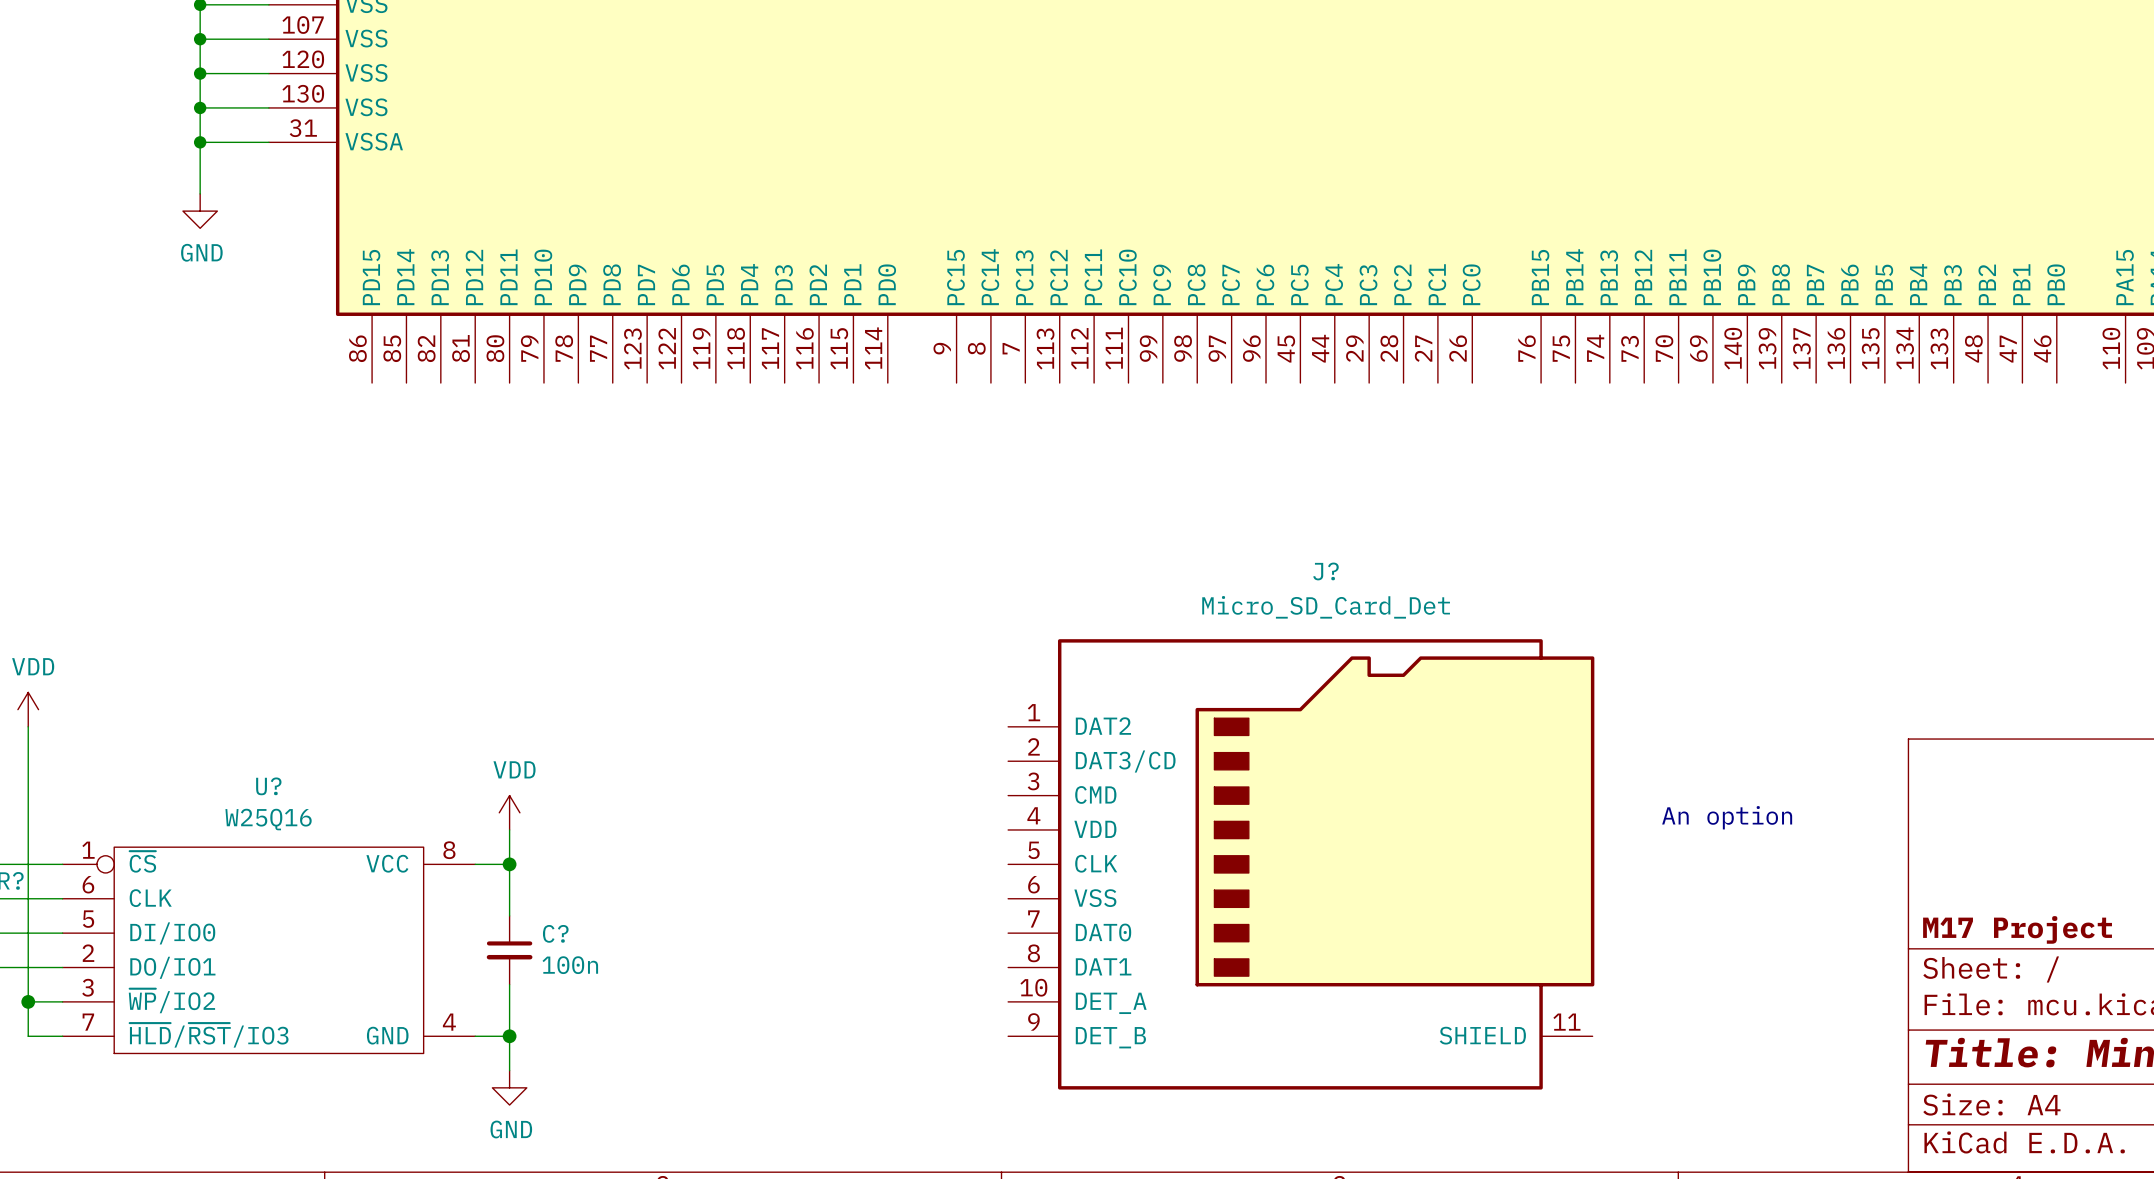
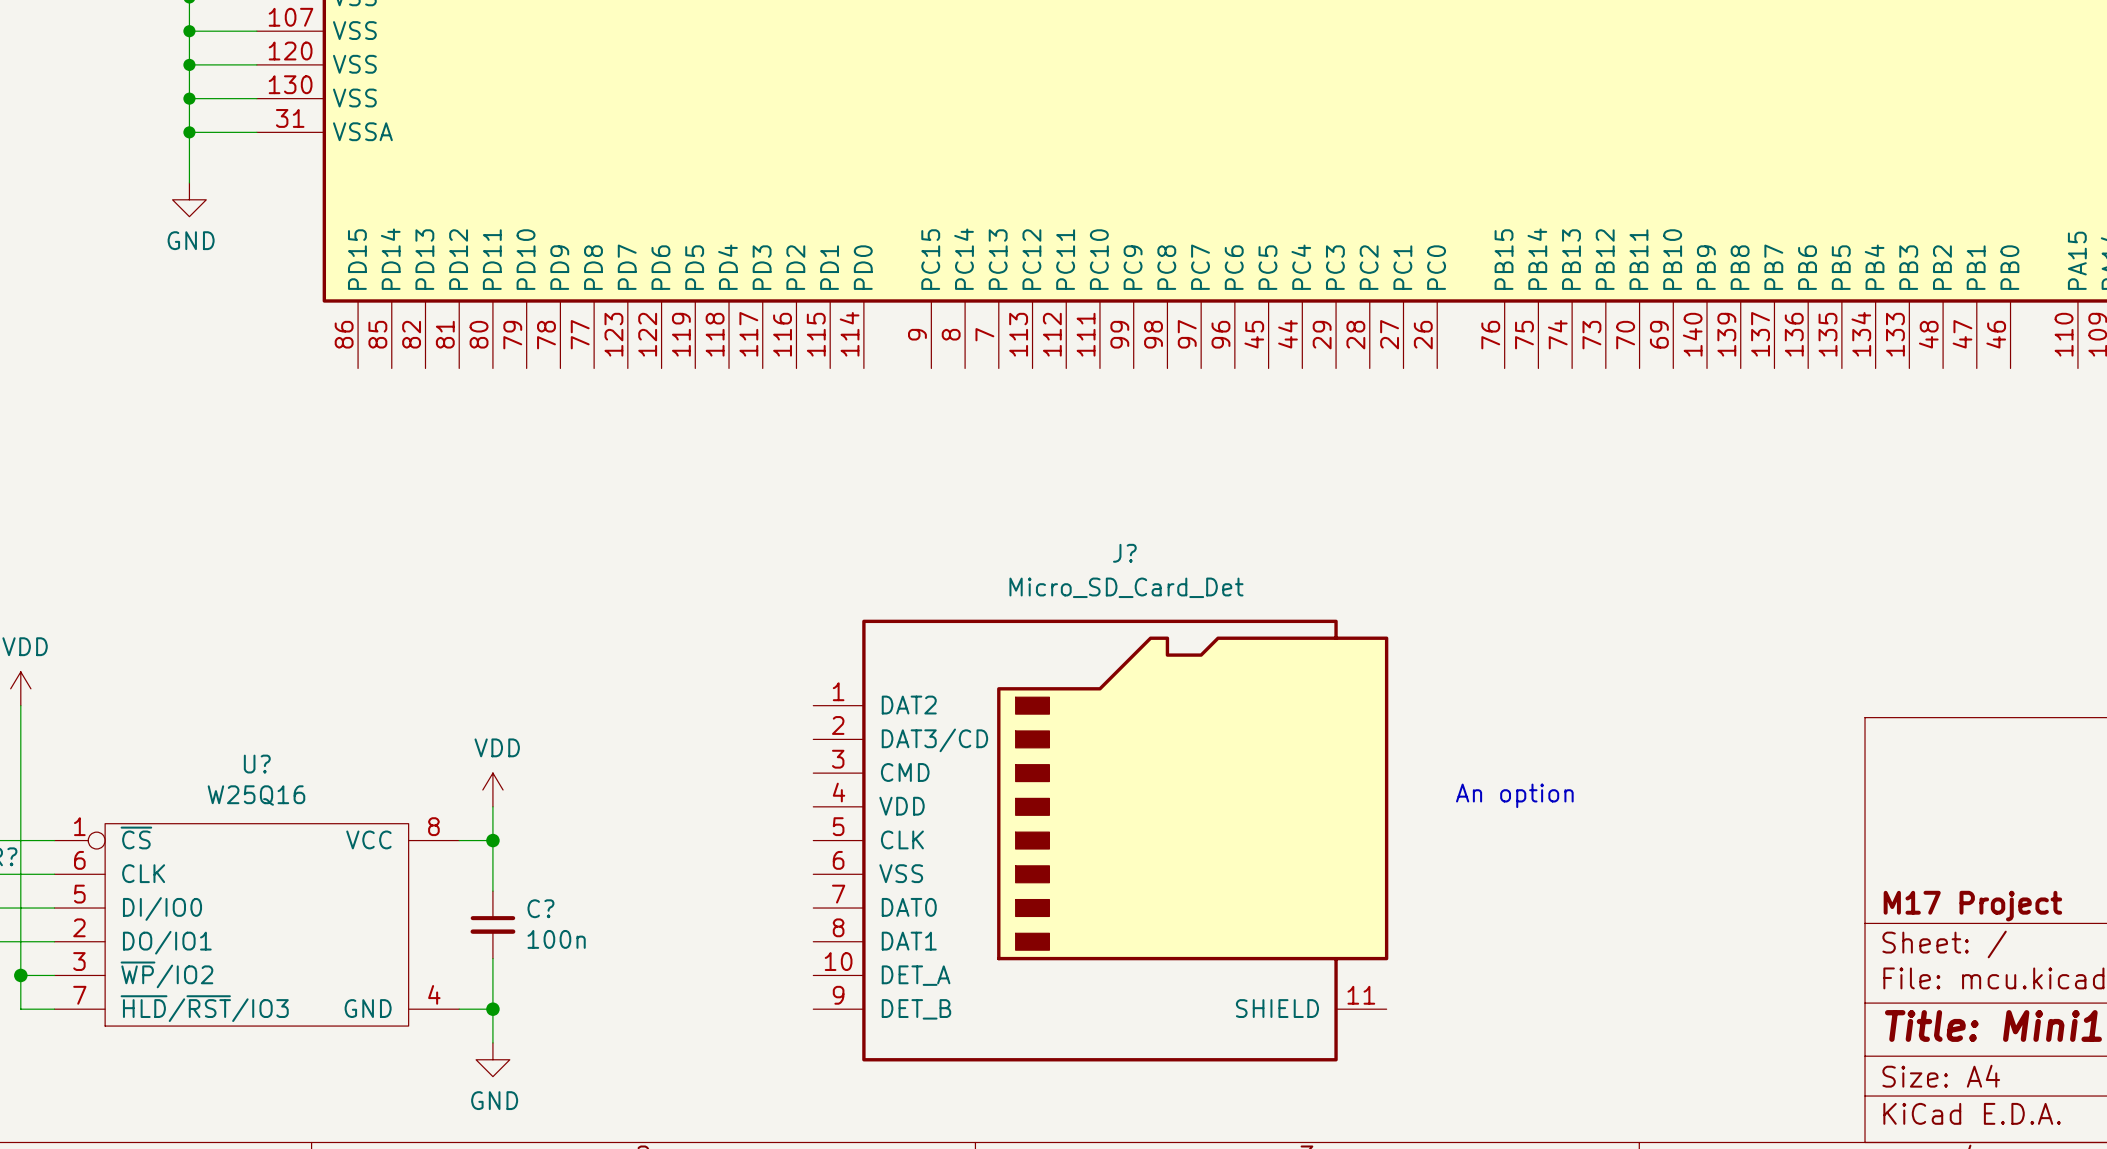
text position: An option (1727, 817) -> An option (1514, 795)
J? position: (1301, 864) -> (1100, 840)

